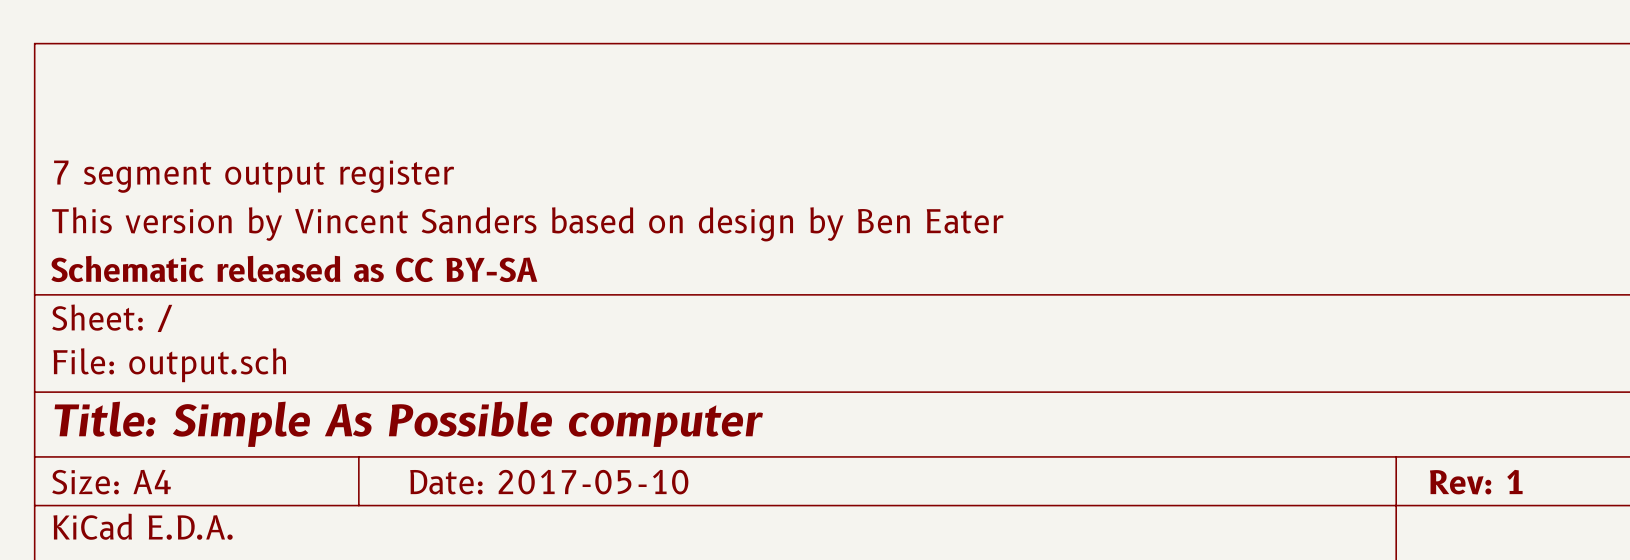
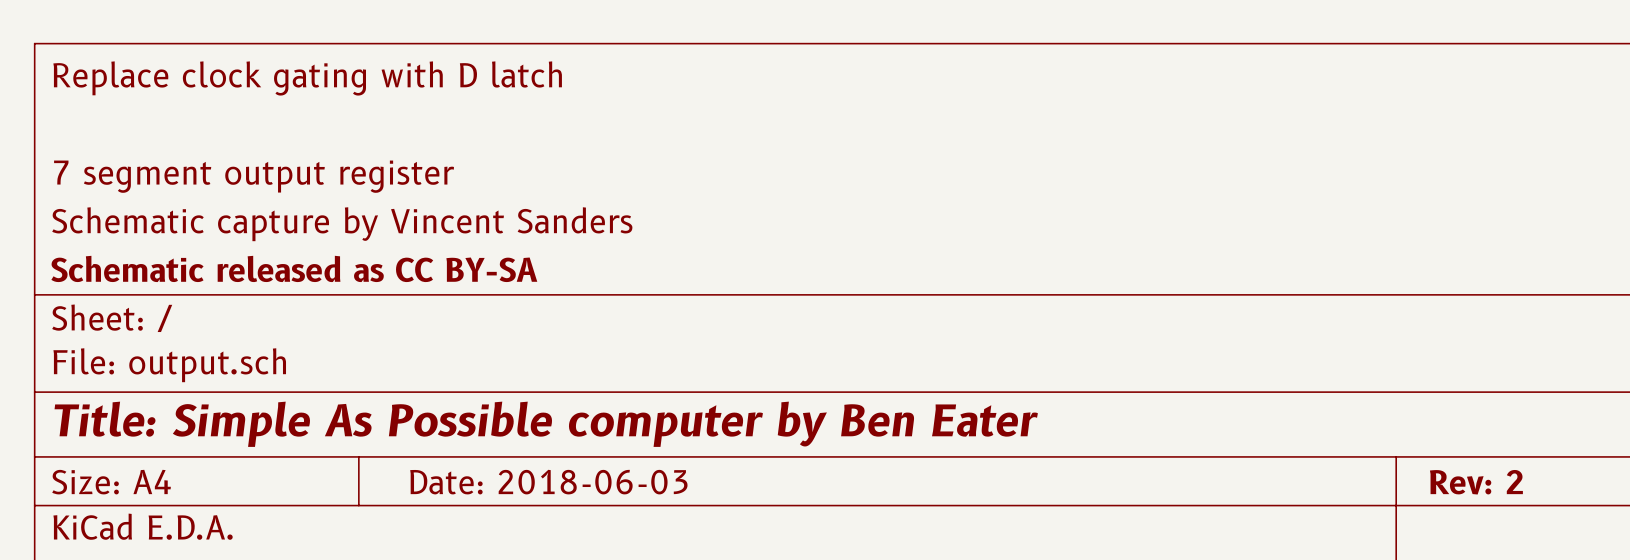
title block: none -> Replace clock gating with D latch (307, 78)
title block: This version by Vincent Sanders based on design by Ben Eater (527, 224) -> Schematic capture by Vincent Sanders (342, 224)
title block: Title: Simple As Possible computer (408, 424) -> Title: Simple As Possible computer by Ben Eater (546, 424)
title block: Date: 2017-05-10 (549, 482) -> Date: 2018-06-03 (548, 482)
title block: Rev: 1 (1476, 482) -> Rev: 2 (1476, 482)

